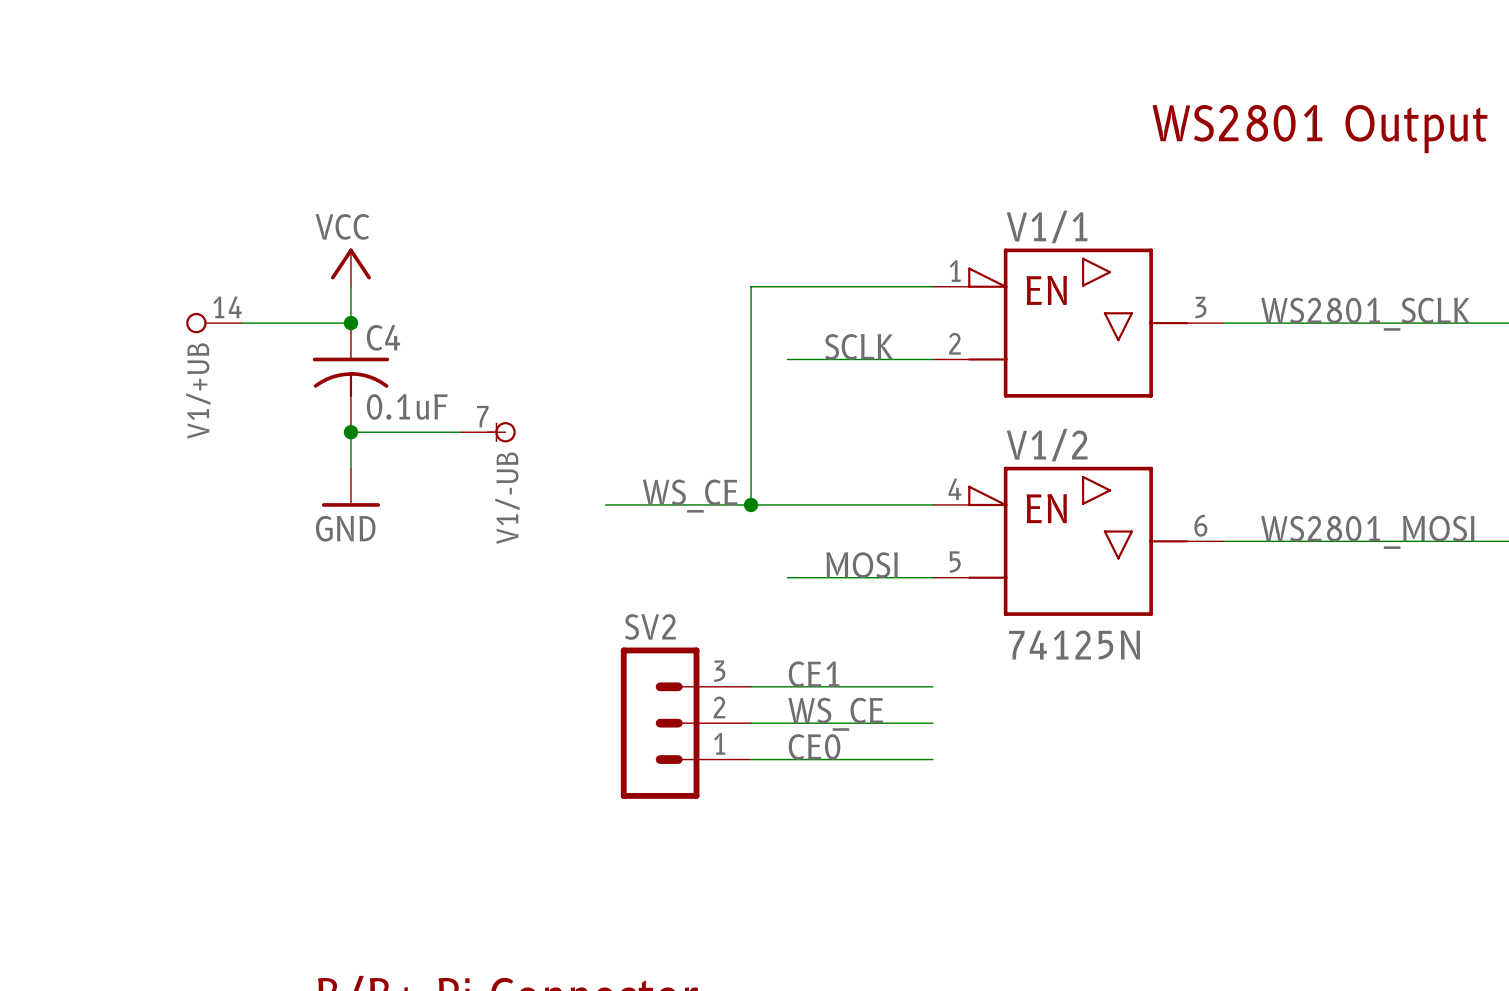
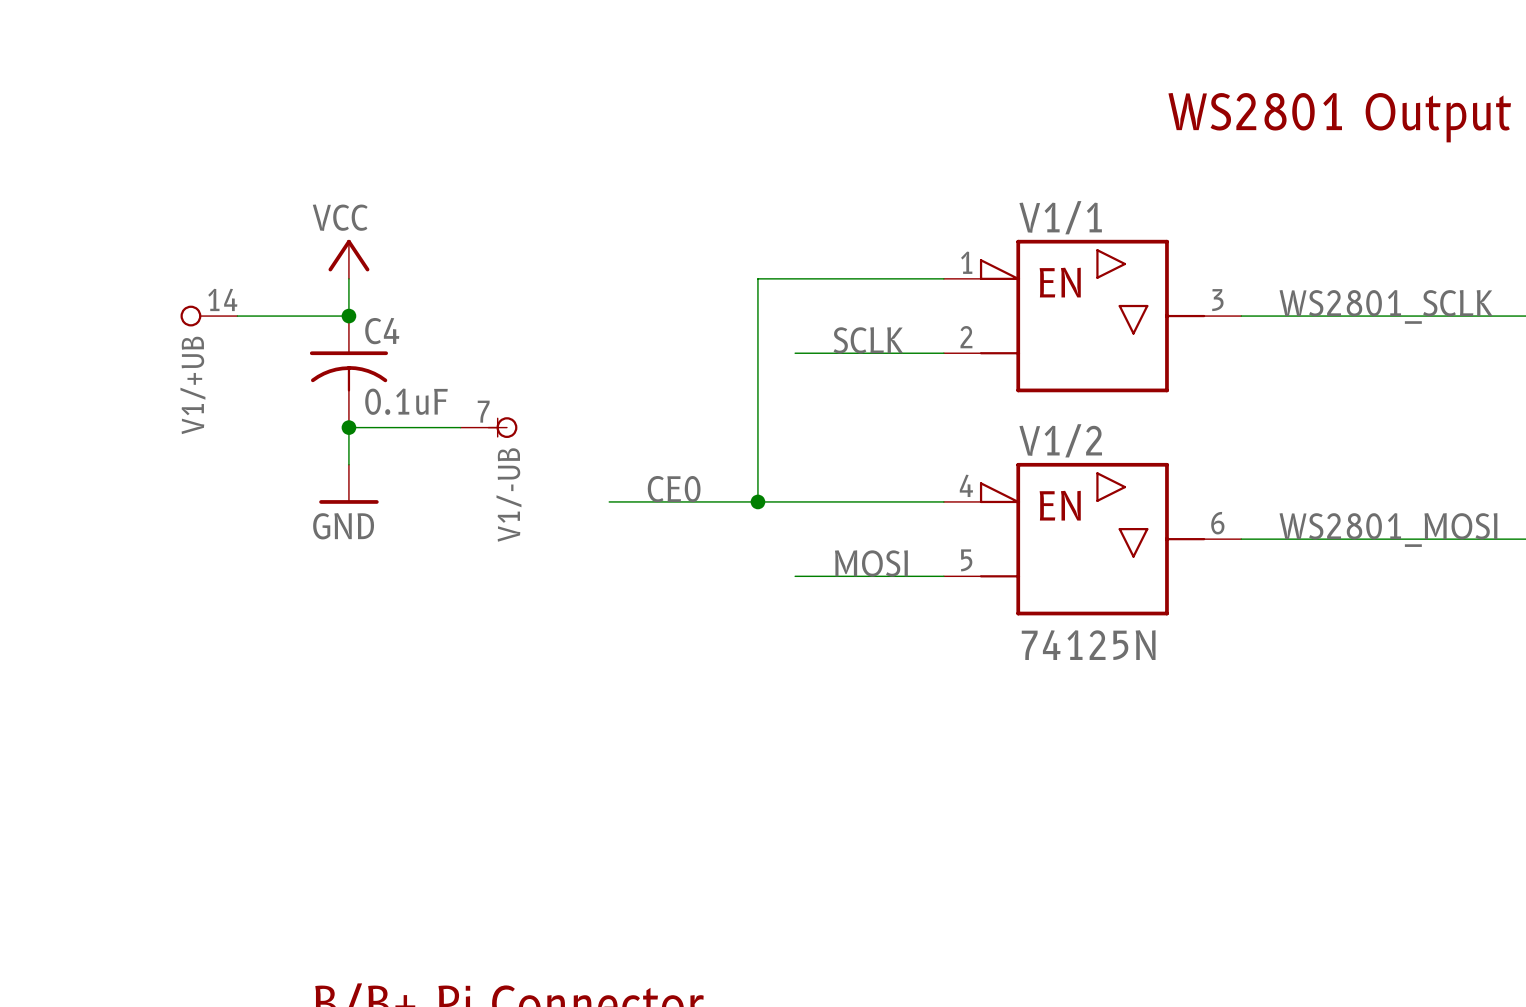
label: WS_CE (690, 496) -> CE0 (674, 489)
label: CE1 (814, 674) -> none
wire: (751, 686) (932, 686) -> none
label: WS_CE (835, 714) -> none
SV2: (685, 723) -> none
wire: (751, 723) (932, 723) -> none
label: CE0 (814, 746) -> none
wire: (751, 759) (932, 759) -> none

